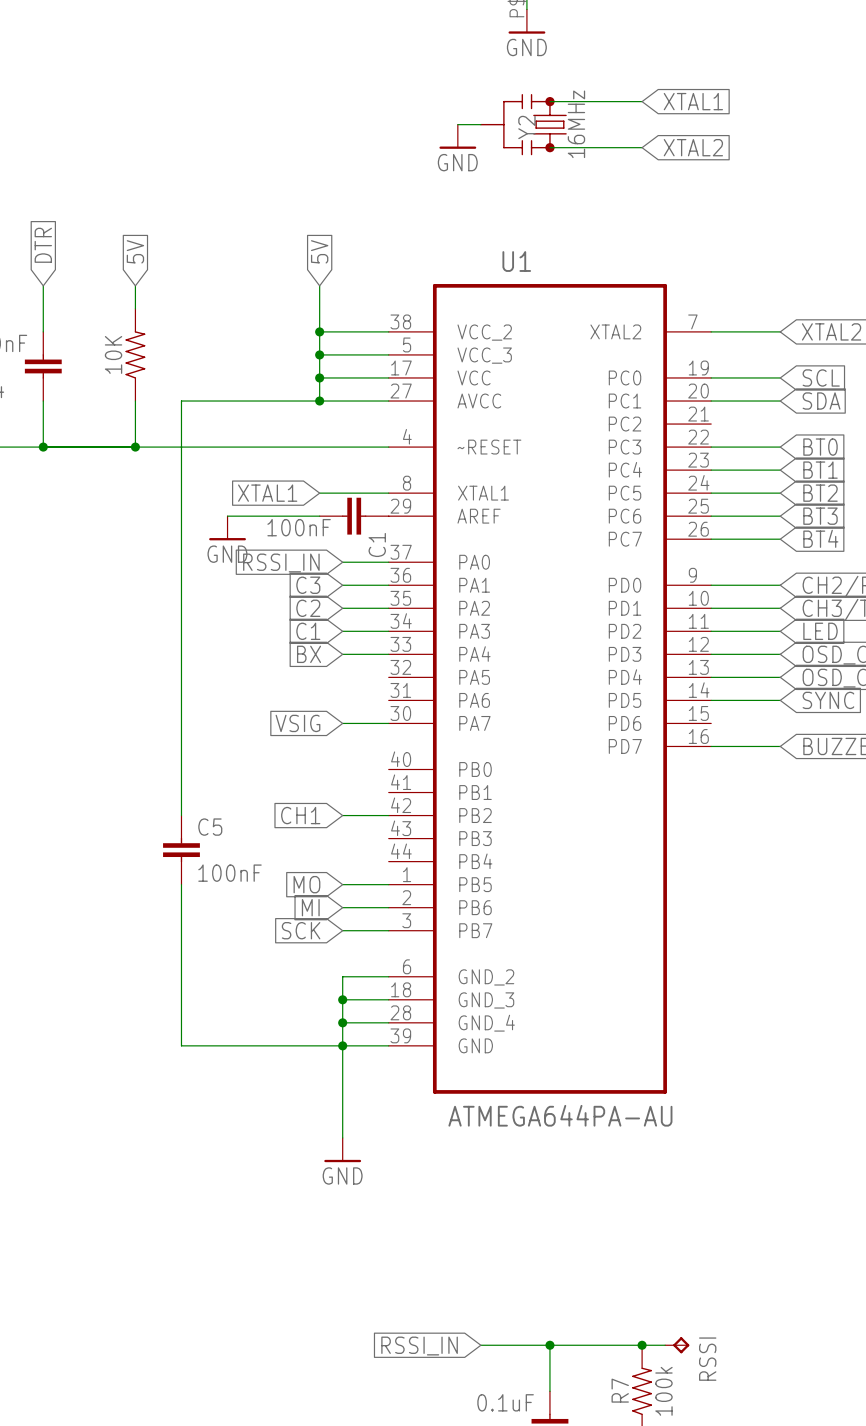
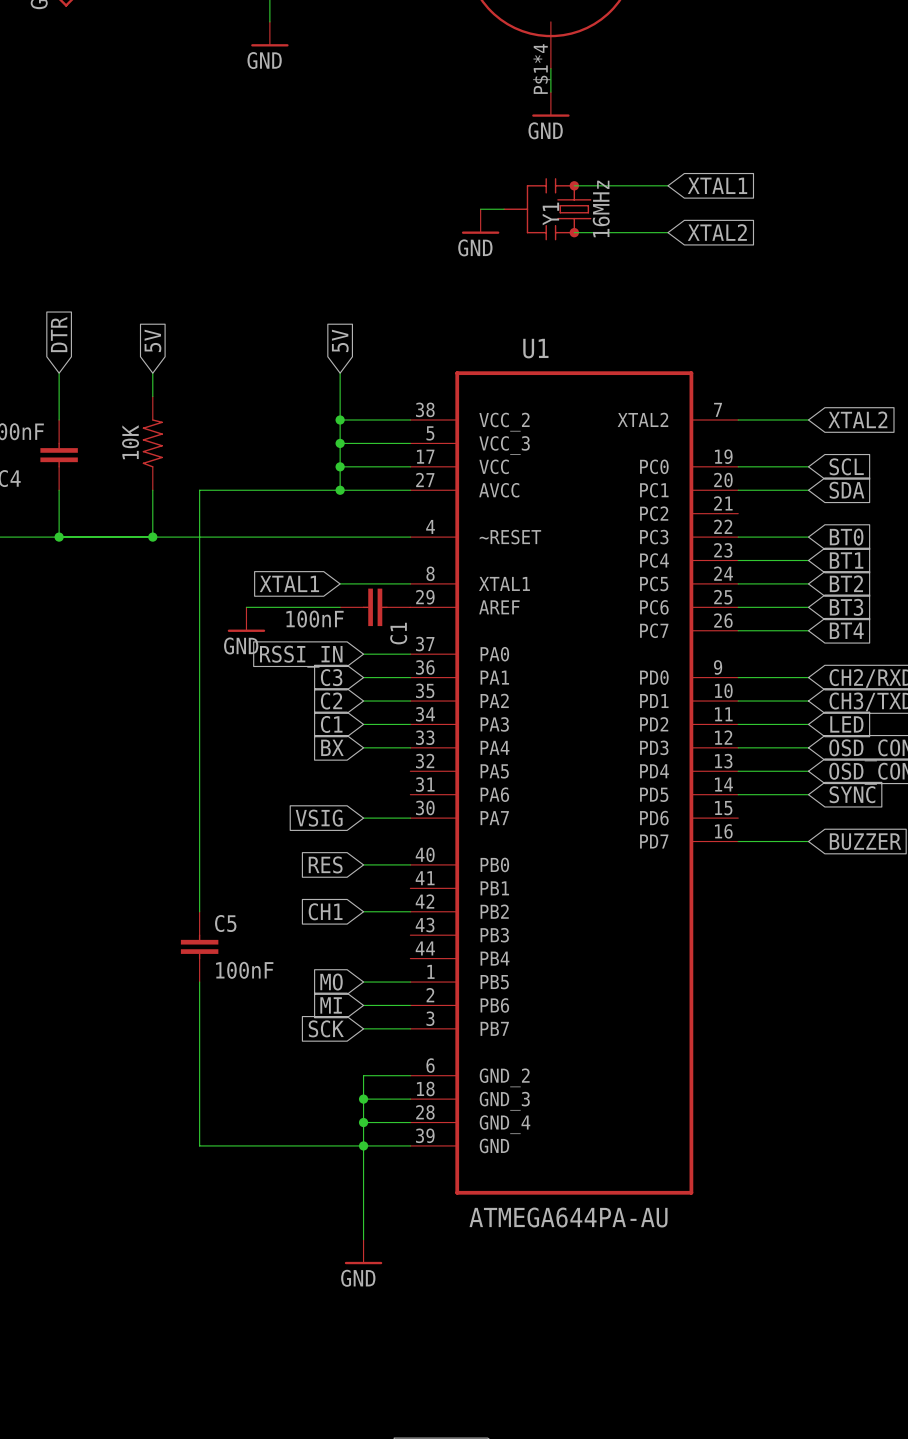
Y2 name: Y2 (526, 127) -> Y1 (550, 213)
global label: none -> RES (325, 864)
wire: none -> (363, 864) (410, 864)

